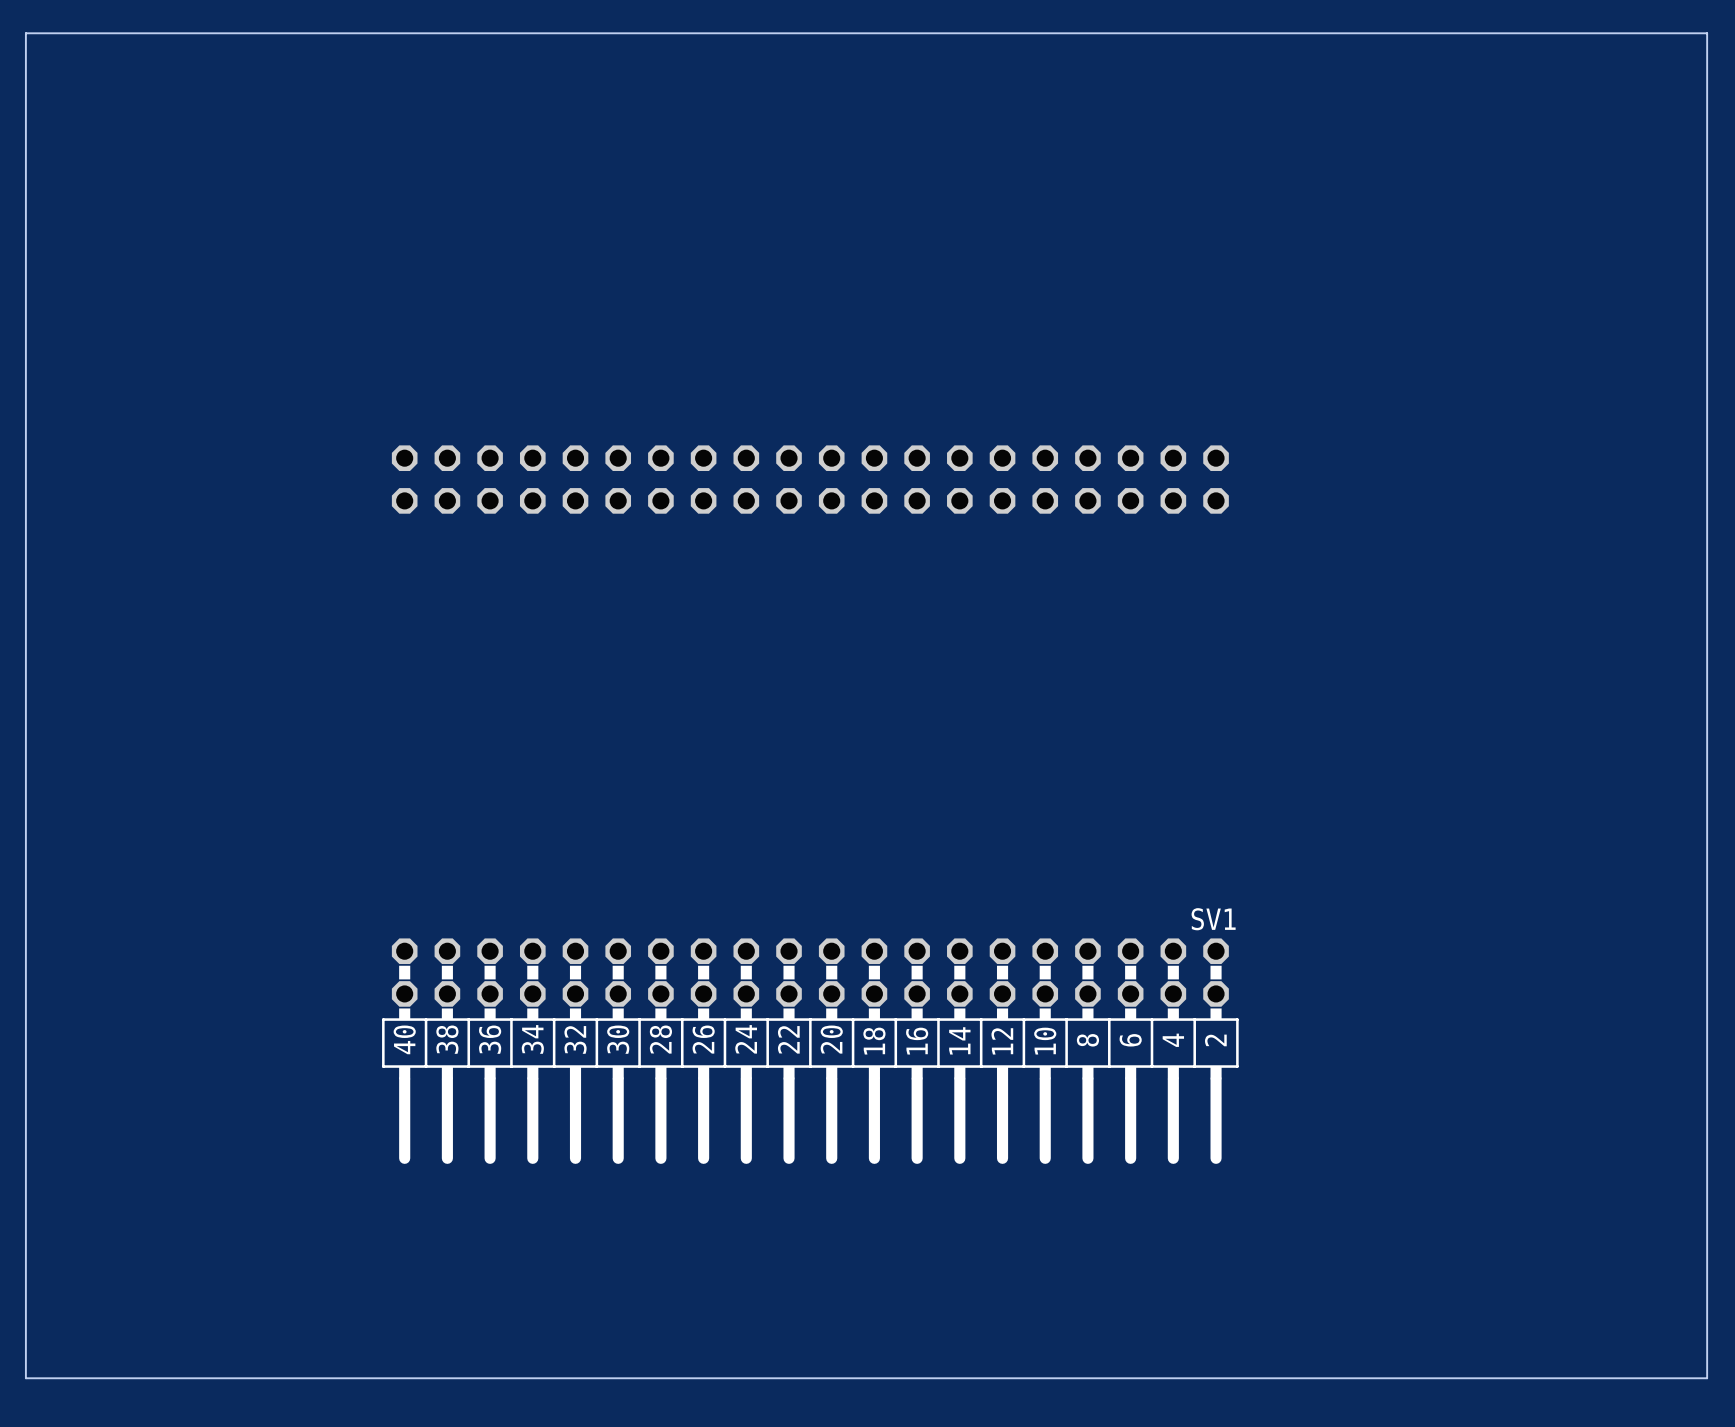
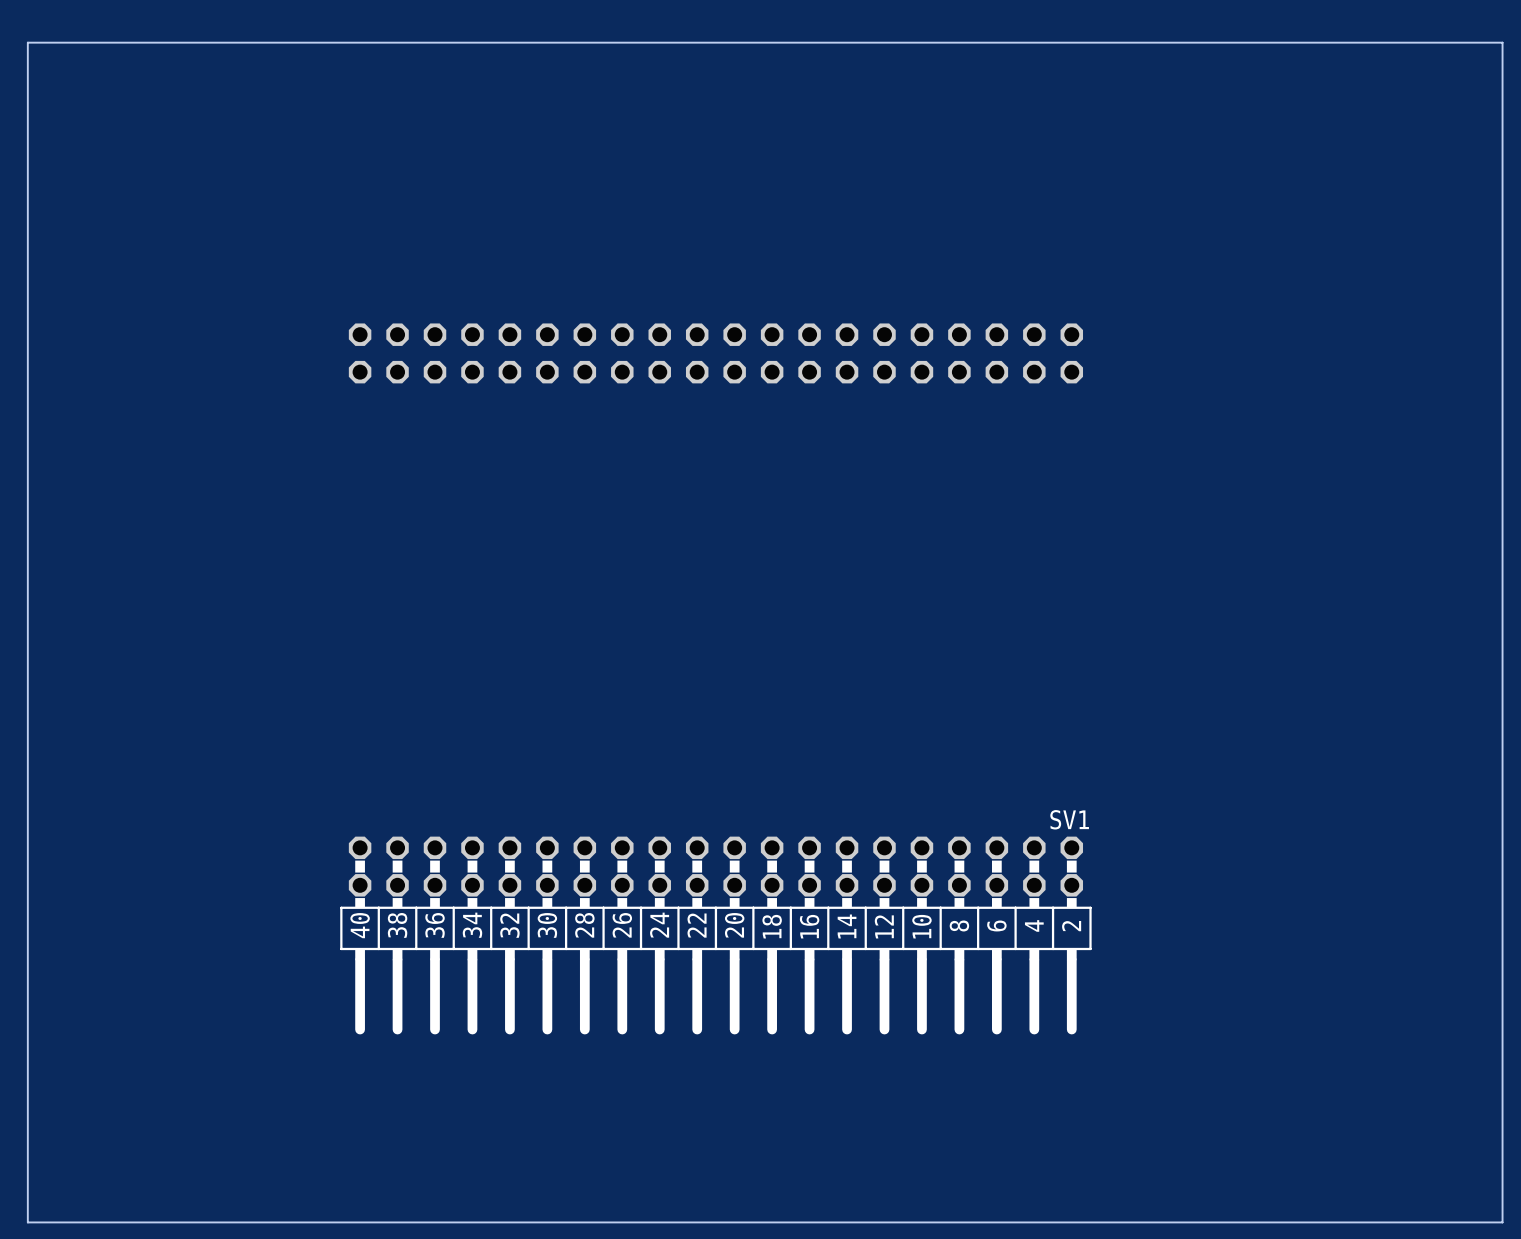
part position: (810, 479) -> (715, 353)

